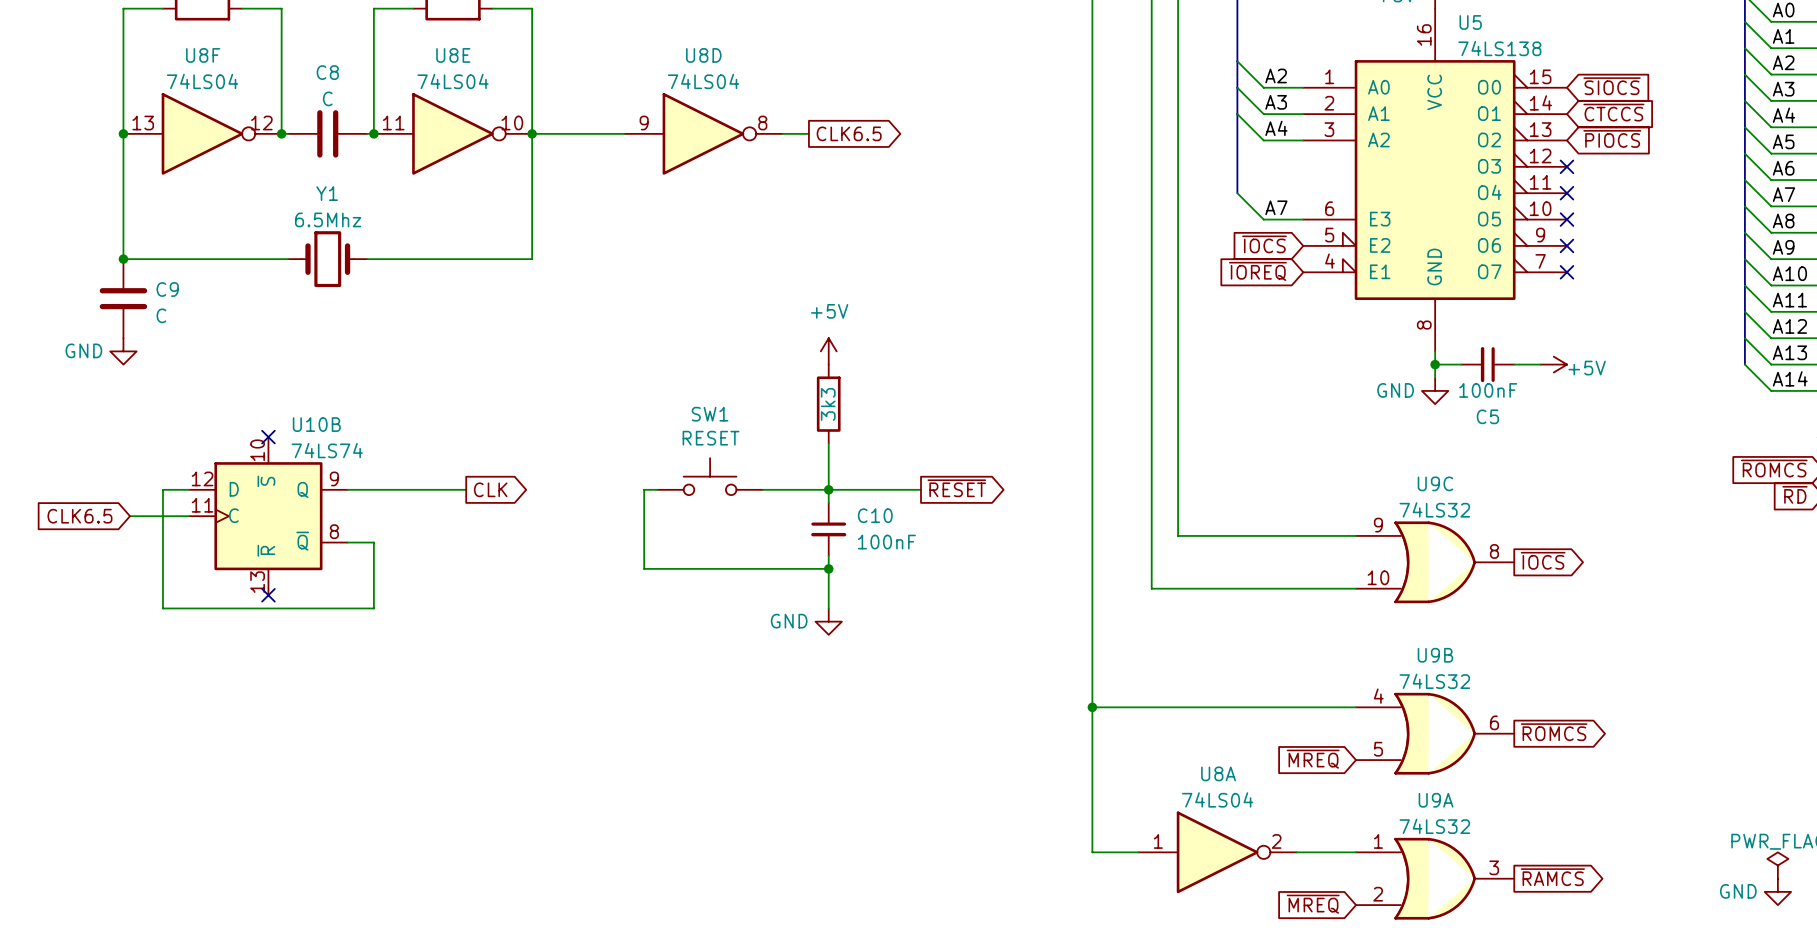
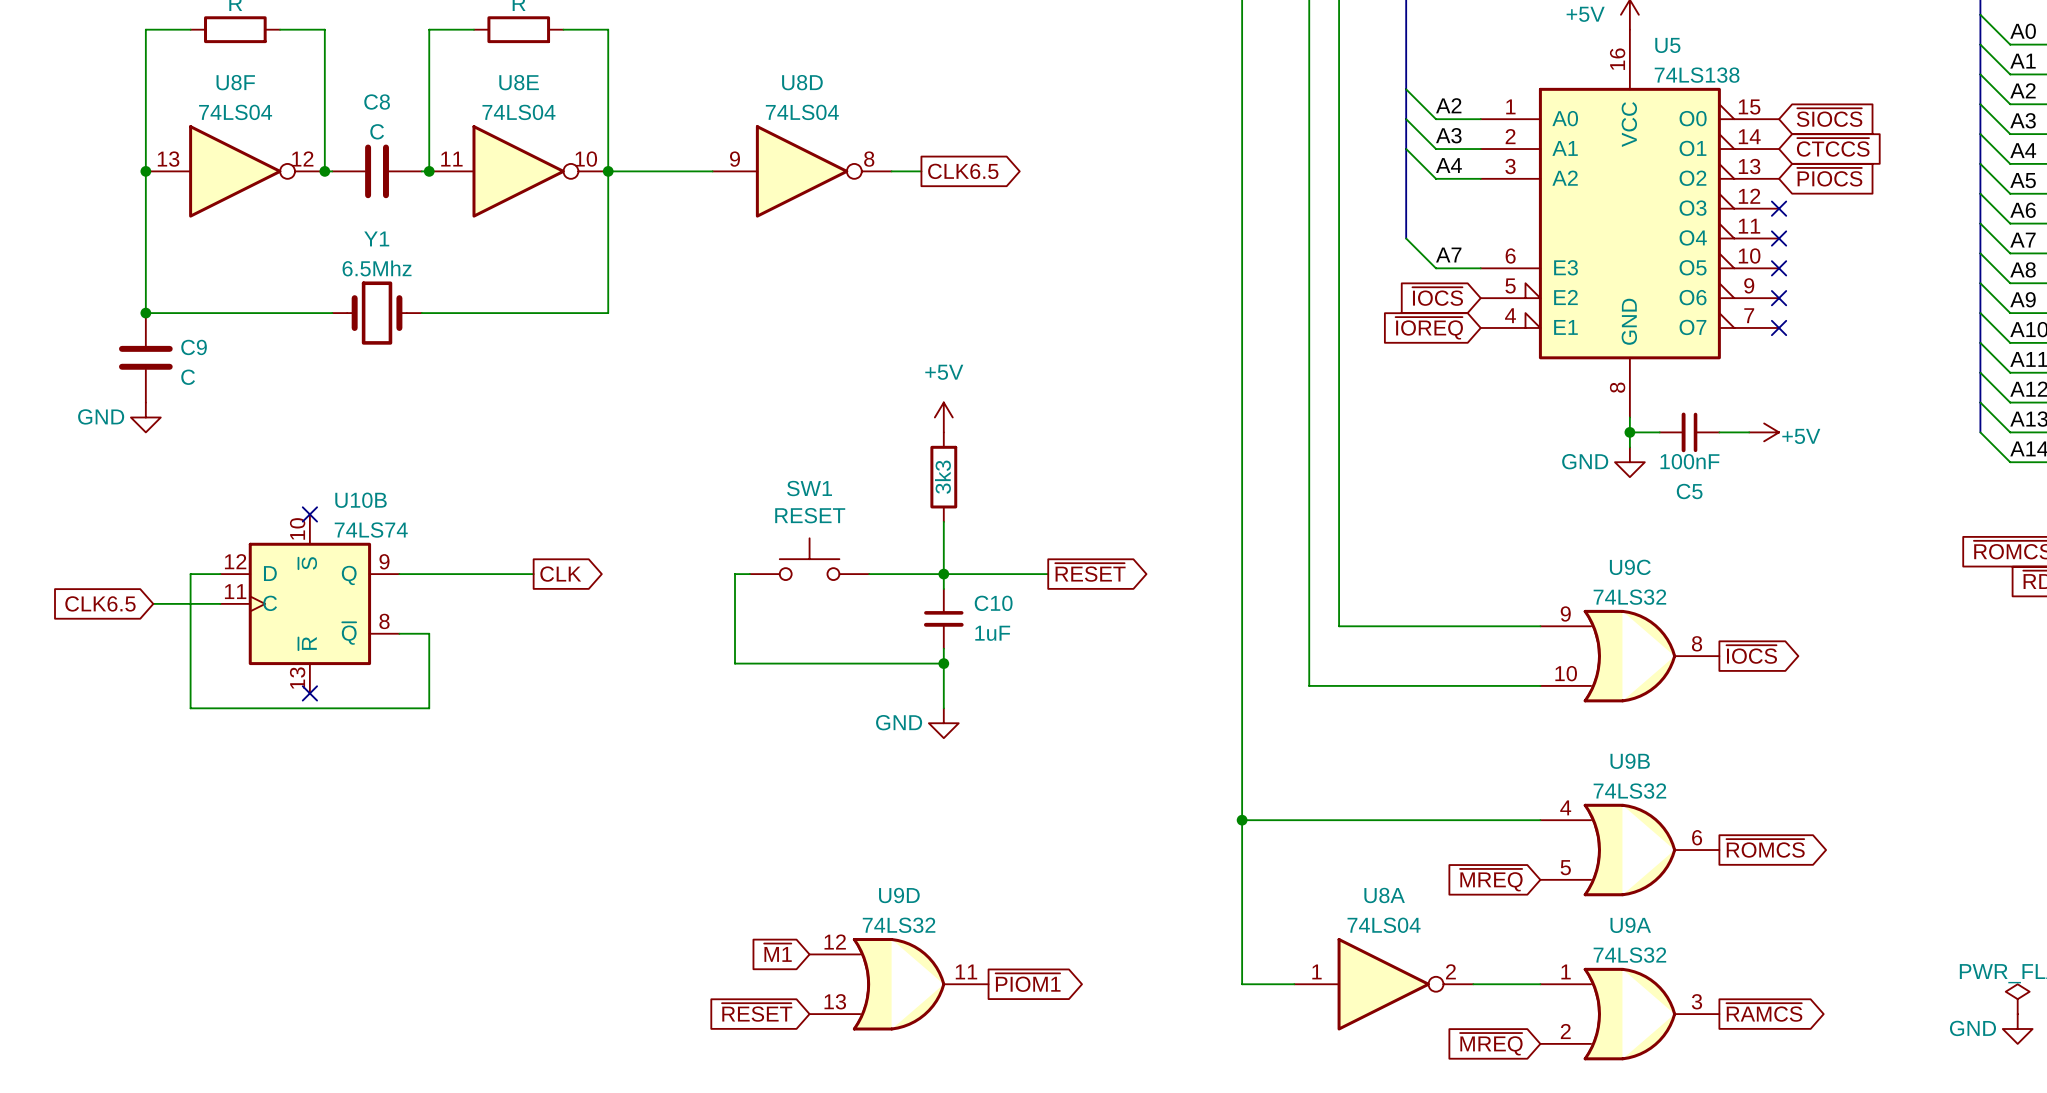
C10 value: 100nF (886, 542) -> 1uF (992, 633)
global label: none -> ~{M1} (777, 952)
global label: none -> ~{PIOM1} (1028, 982)
U9D: none -> 74LS32 (899, 984)
global label: none -> ~{RESET} (757, 1012)

